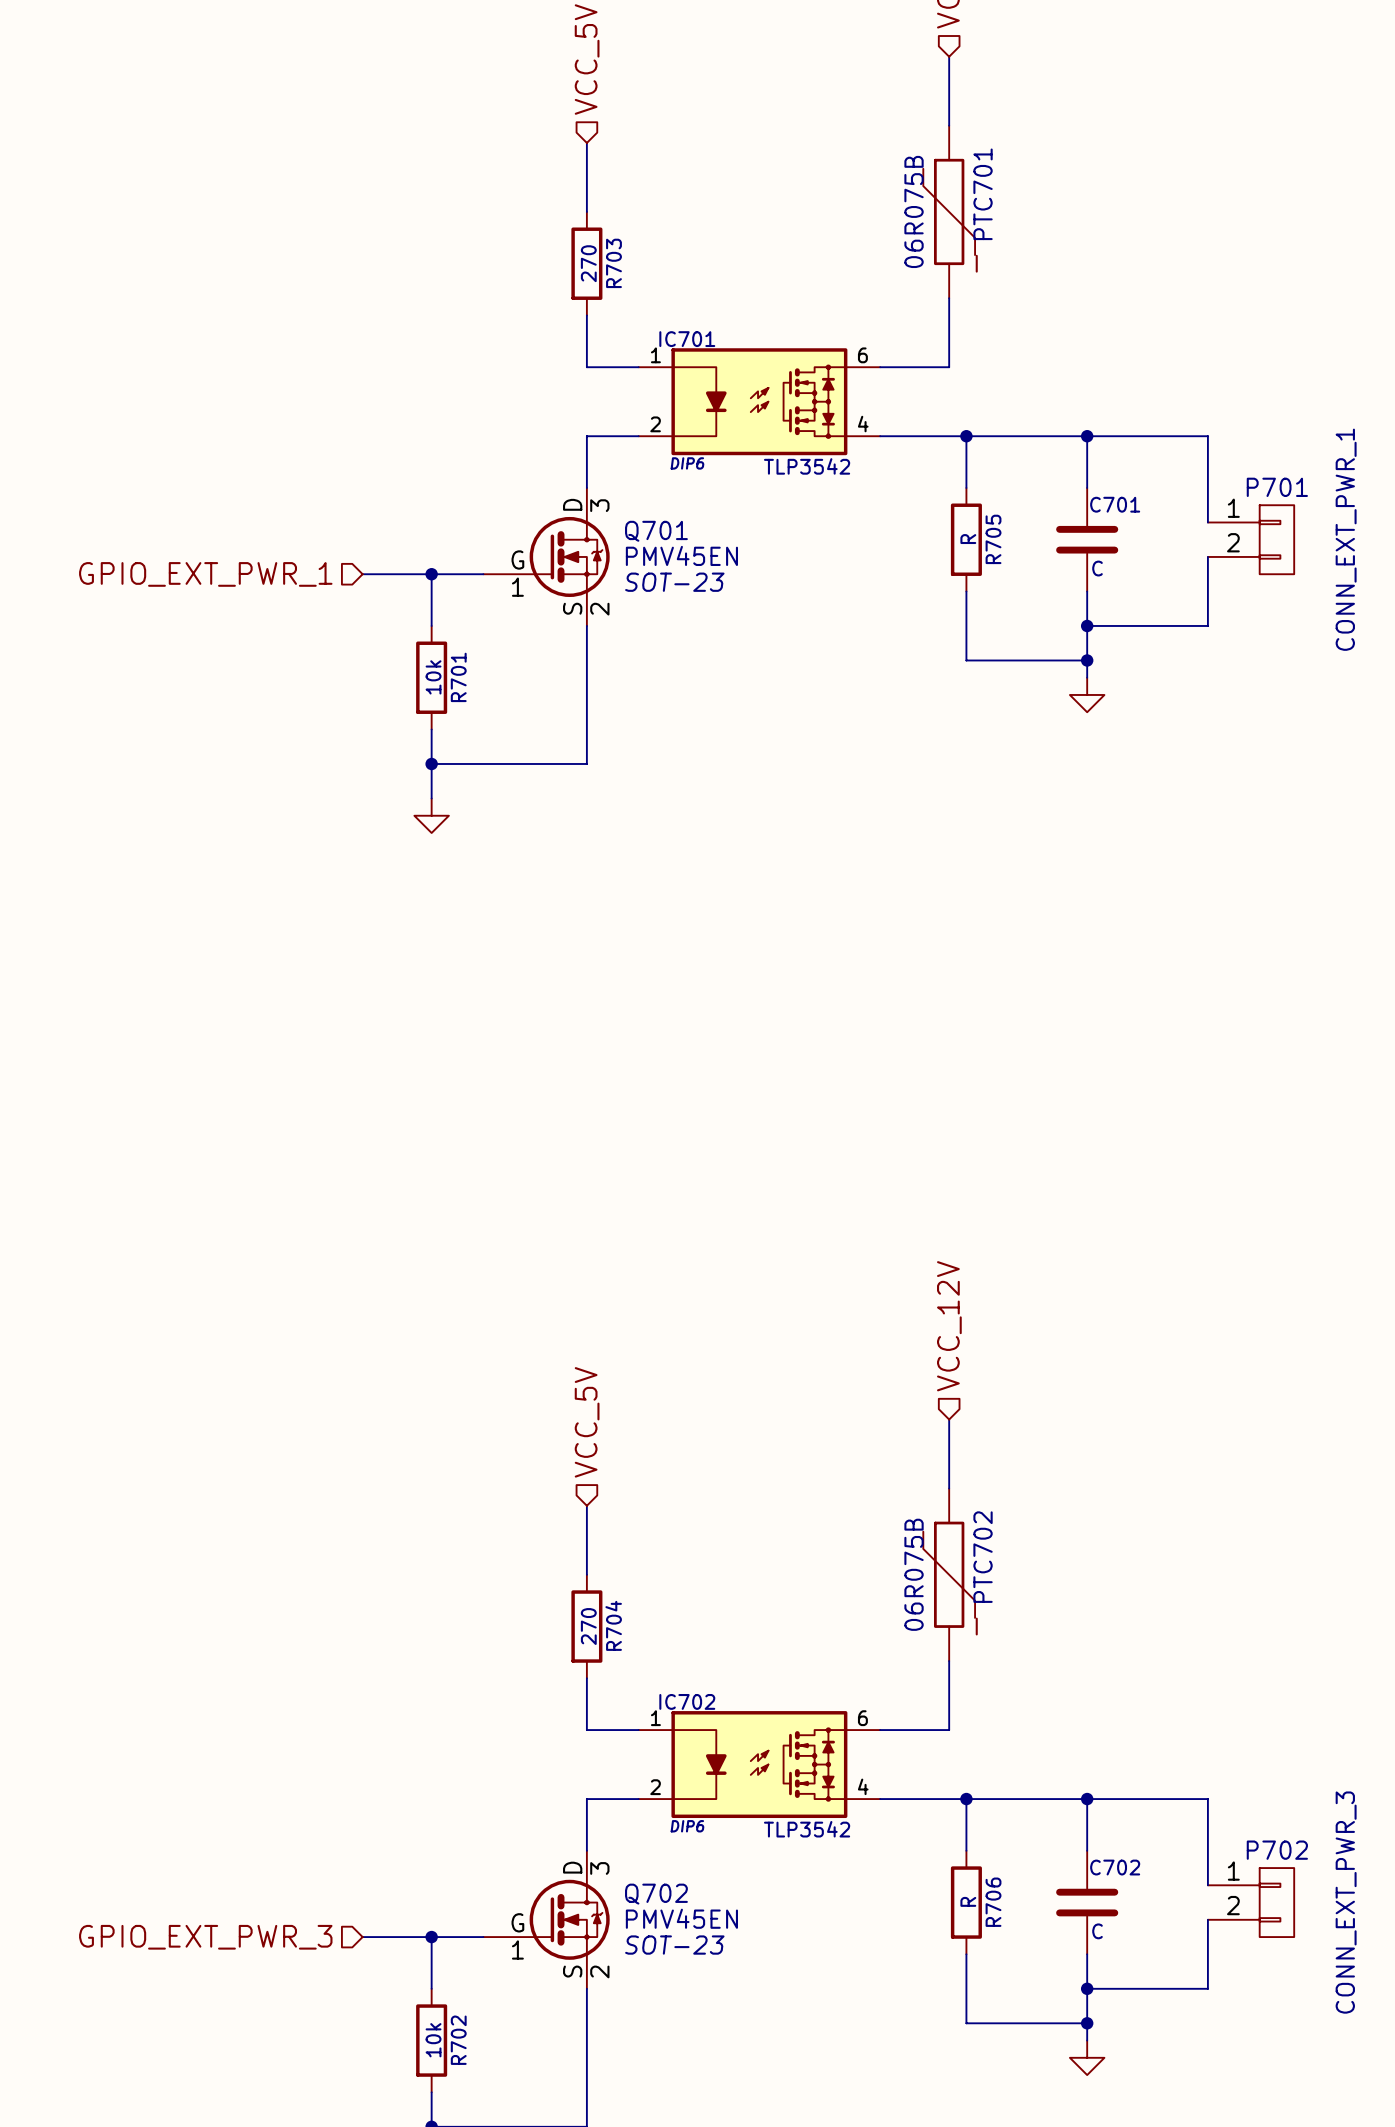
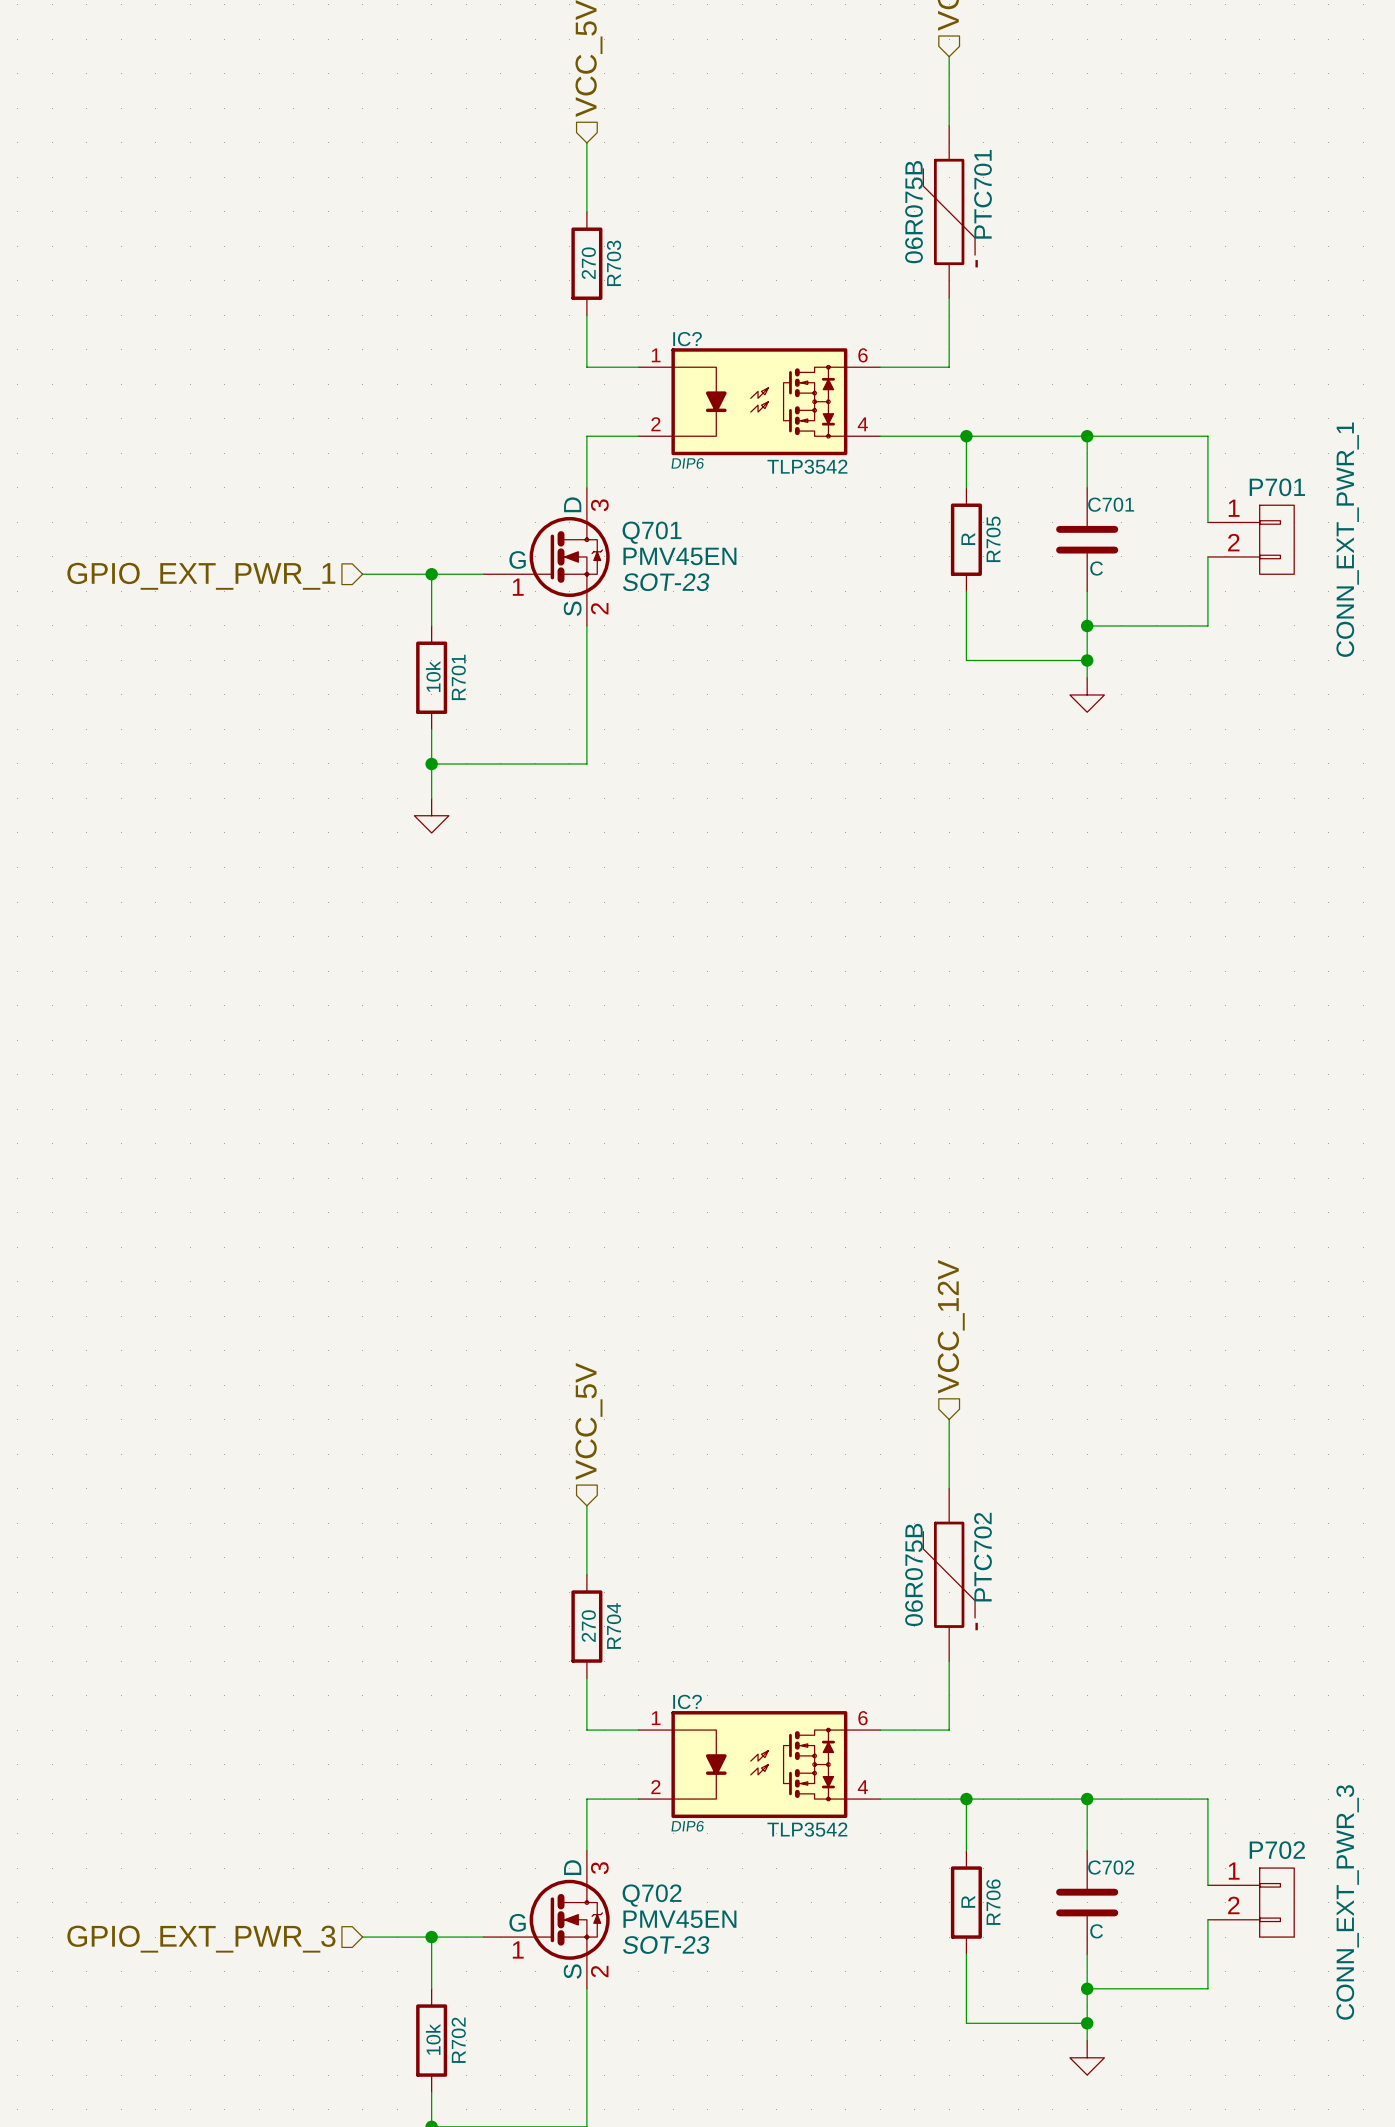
IC701 name: IC701 (687, 339) -> IC? (687, 339)
IC702 name: IC702 (687, 1701) -> IC? (687, 1701)

